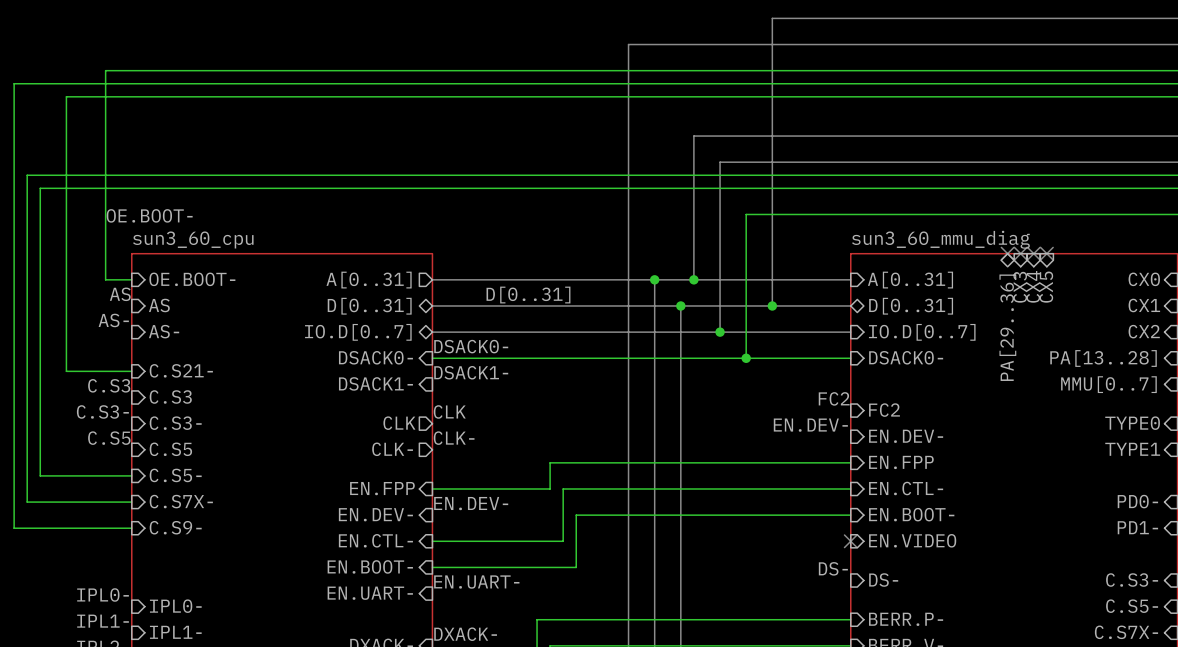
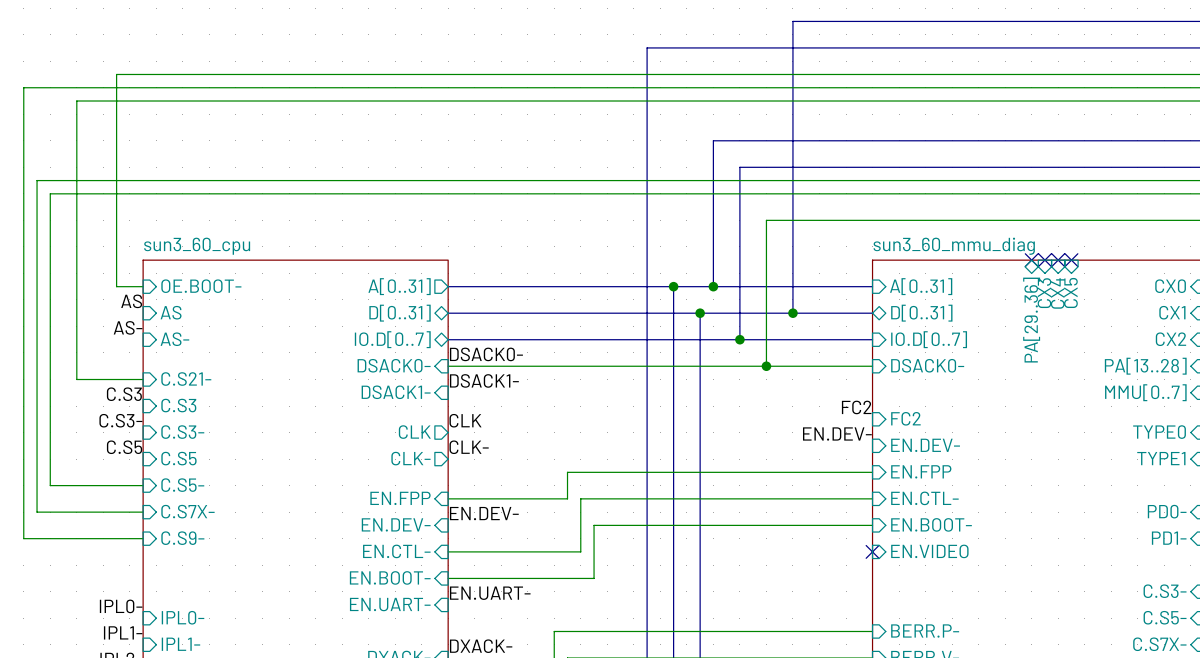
label: OE.BOOT- (149, 215) -> none
label: D[0..31] (528, 295) -> none
label: DS- (833, 568) -> none
sheet pin: DS- (883, 580) -> none

